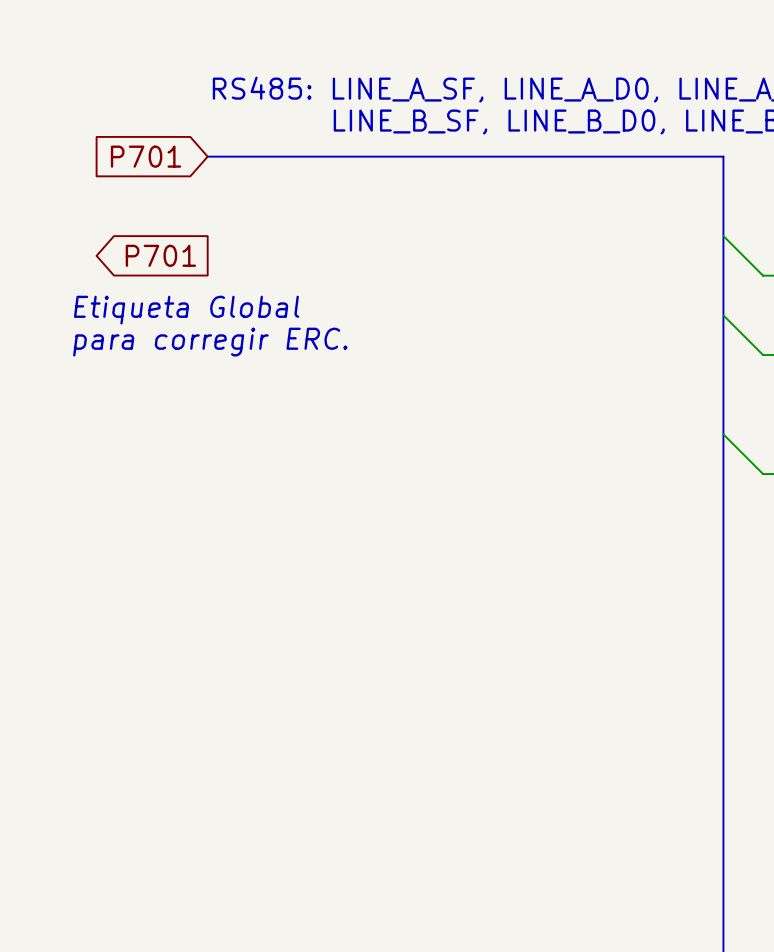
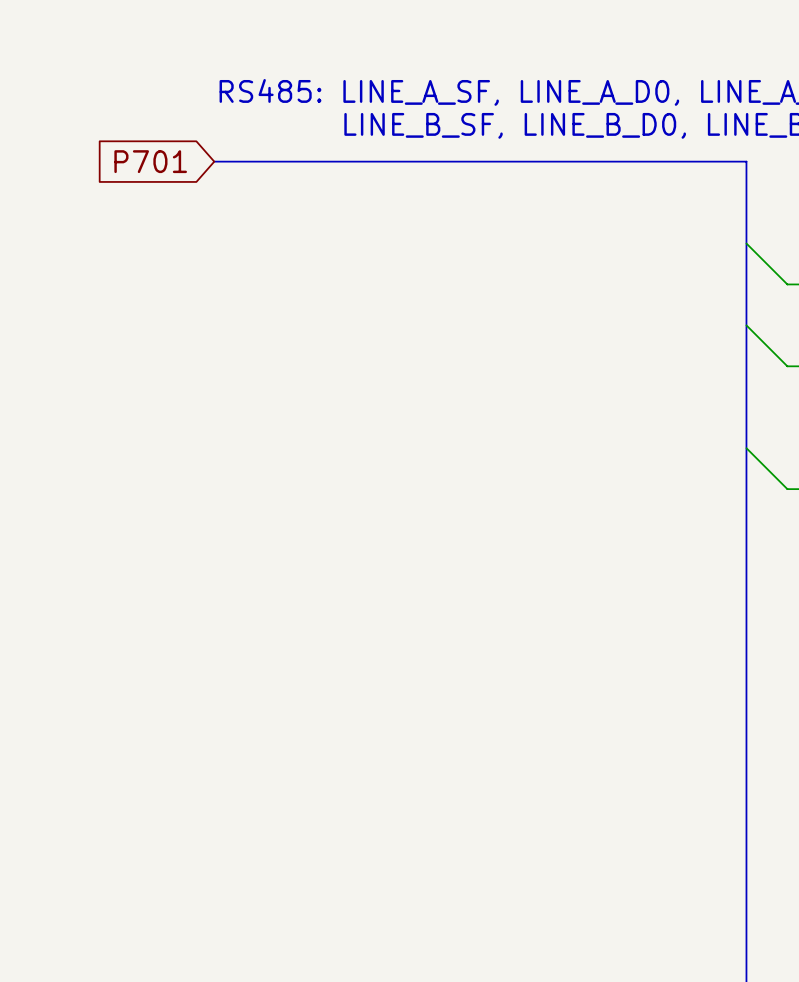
global label: P701 (160, 255) -> none
text: Etiqueta Global (186, 310) -> none
text: para corregir ERC. (210, 342) -> none

